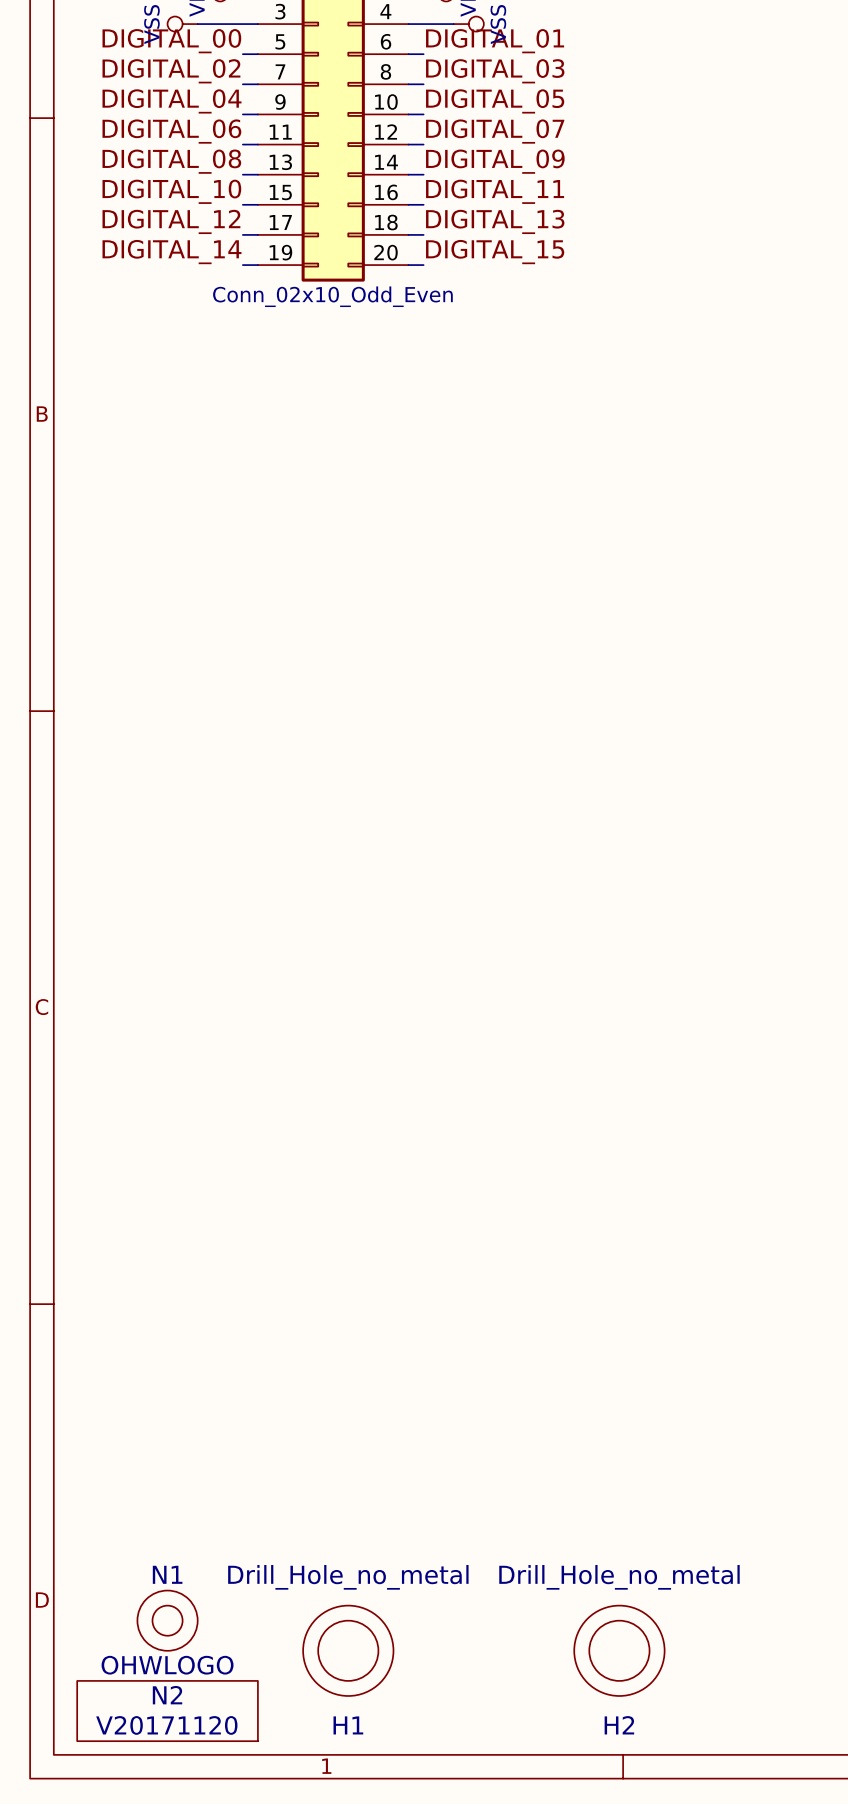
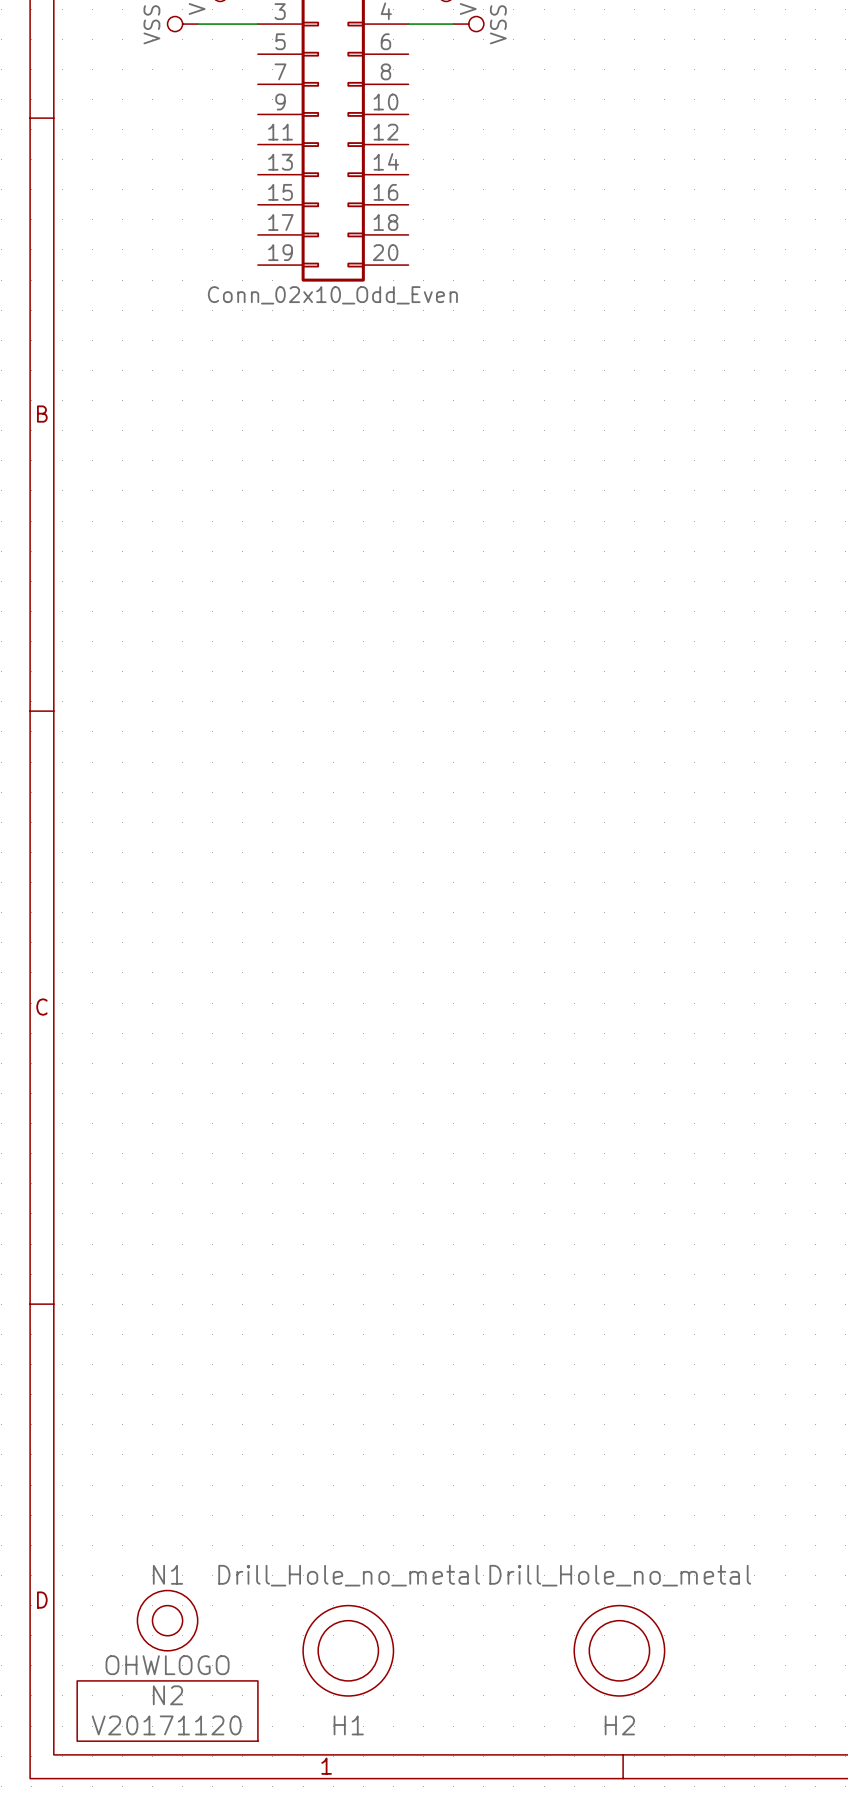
label: DIGITAL_00 (171, 41) -> none
label: DIGITAL_01 (495, 41) -> none
wire: (242, 54) (257, 54) -> none
wire: (408, 54) (423, 54) -> none
label: DIGITAL_02 (171, 71) -> none
label: DIGITAL_03 (495, 71) -> none
wire: (242, 84) (257, 84) -> none
wire: (408, 84) (423, 84) -> none
label: DIGITAL_04 (171, 101) -> none
label: DIGITAL_05 (495, 101) -> none
wire: (242, 114) (257, 114) -> none
wire: (408, 114) (423, 114) -> none
label: DIGITAL_06 (171, 131) -> none
label: DIGITAL_07 (495, 131) -> none
wire: (242, 144) (257, 144) -> none
wire: (408, 144) (423, 144) -> none
label: DIGITAL_08 (171, 161) -> none
label: DIGITAL_09 (495, 161) -> none
wire: (242, 174) (257, 174) -> none
wire: (408, 174) (423, 174) -> none
label: DIGITAL_10 (171, 191) -> none
label: DIGITAL_11 (495, 191) -> none
wire: (242, 204) (257, 204) -> none
wire: (408, 204) (423, 204) -> none
label: DIGITAL_12 (171, 221) -> none
label: DIGITAL_13 (495, 221) -> none
wire: (242, 234) (257, 234) -> none
wire: (408, 234) (423, 234) -> none
label: DIGITAL_14 (171, 252) -> none
label: DIGITAL_15 (495, 252) -> none
wire: (242, 265) (257, 265) -> none
wire: (408, 265) (423, 265) -> none

